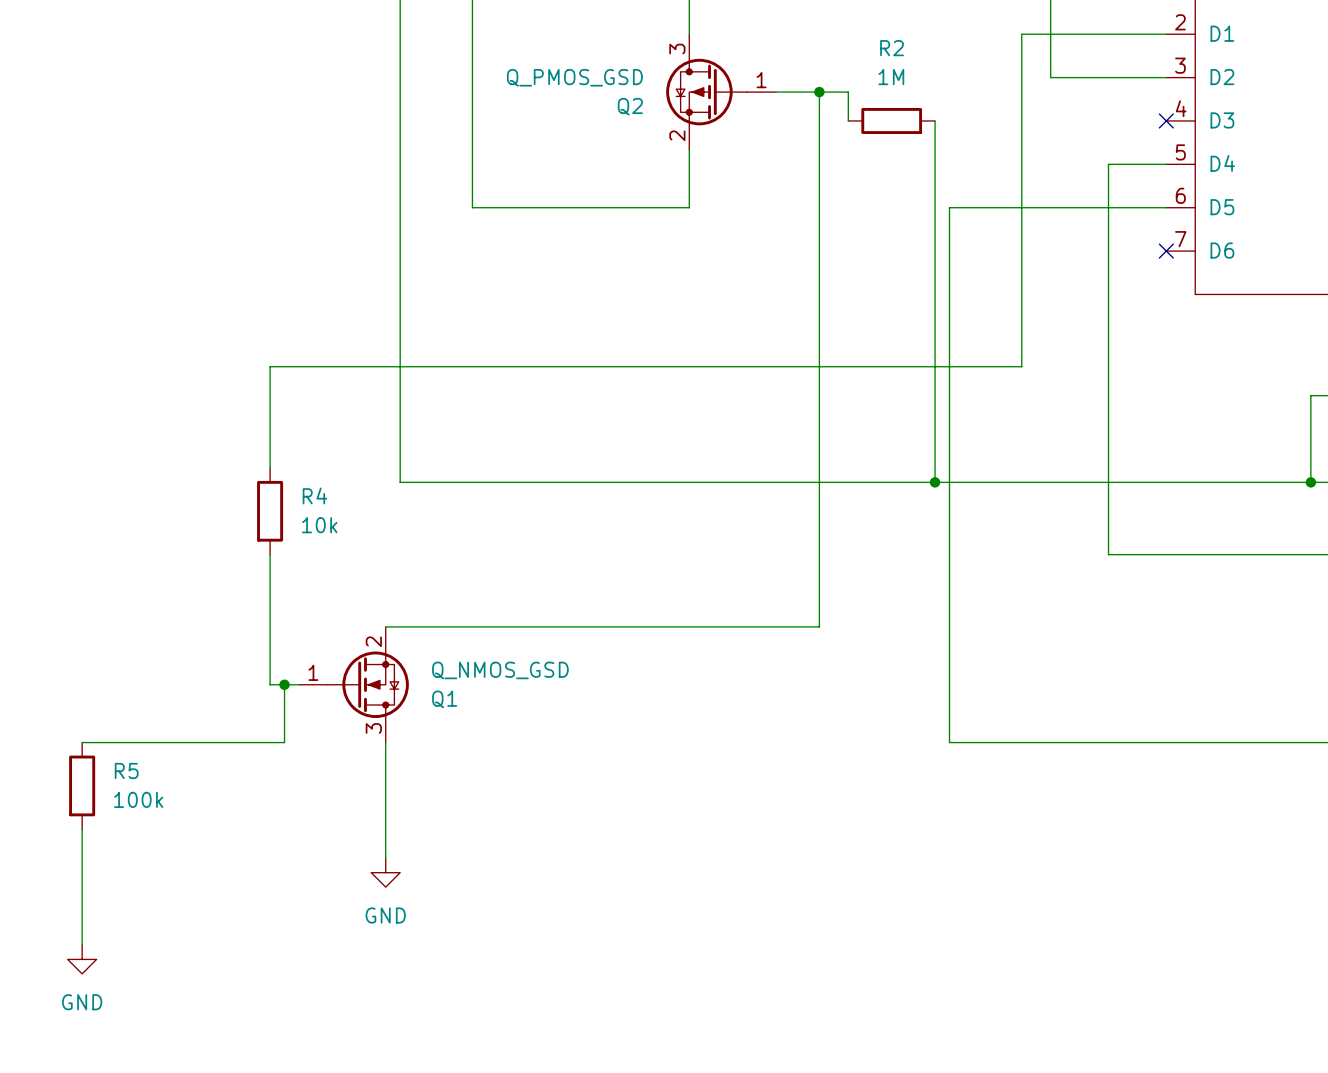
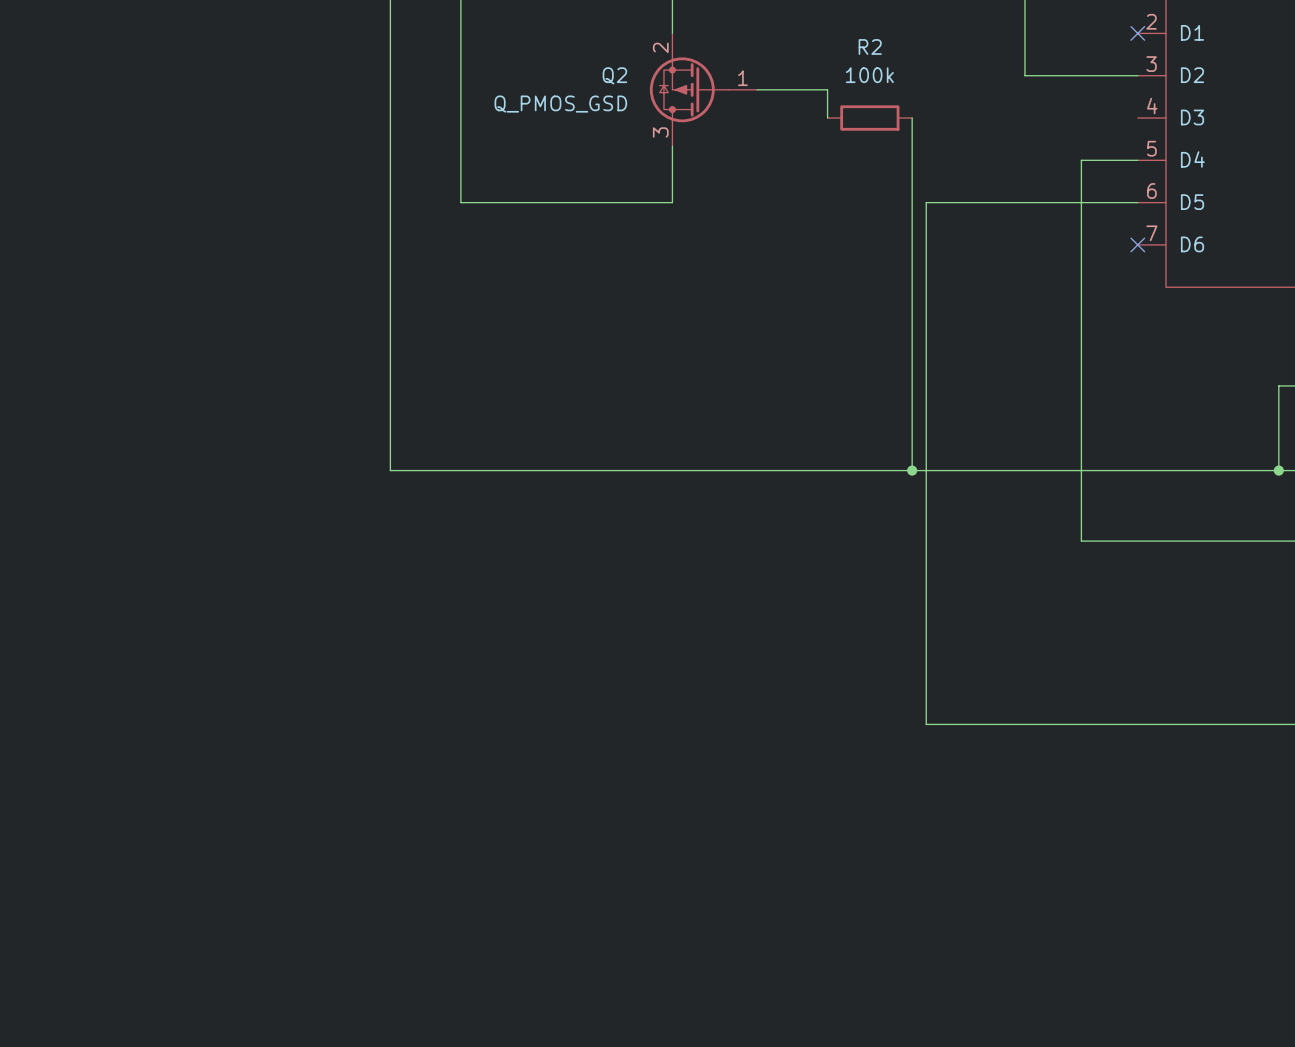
wire: (1166, 34) (1021, 34) (1021, 366) (270, 366) (270, 467) -> none
no-connect mark: none -> (1137, 33)
R2 value: 1M (891, 77) -> 100k (869, 75)
Q2 flip: as is (706, 92) -> up-down (689, 89)
wire: (819, 92) (819, 626) (385, 626) -> none
junction: (819, 92) -> none
no-connect mark: (1166, 120) -> none
R4: 10k (270, 511) -> none
wire: (270, 554) (270, 684) (298, 684) -> none
wire: (284, 684) (284, 742) (82, 742) -> none
junction: (284, 684) -> none
Q1: Q_NMOS_GSD (353, 684) -> none
wire: (385, 742) (385, 858) -> none
R5: 100k (82, 785) -> none
wire: (82, 829) (82, 944) -> none
power symbol: GND (385, 872) -> none
power symbol: GND (82, 959) -> none

